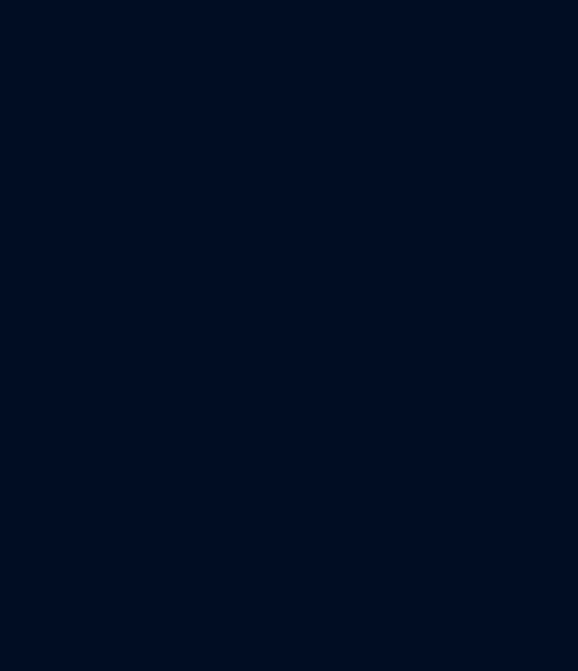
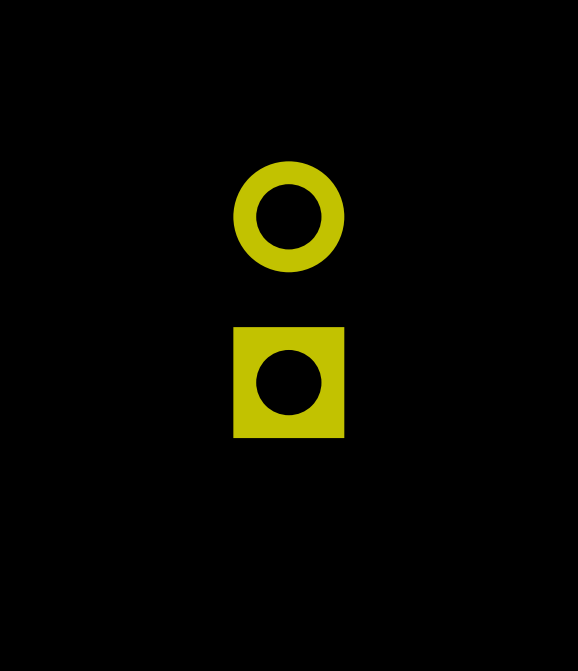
part: none -> (288, 299)

